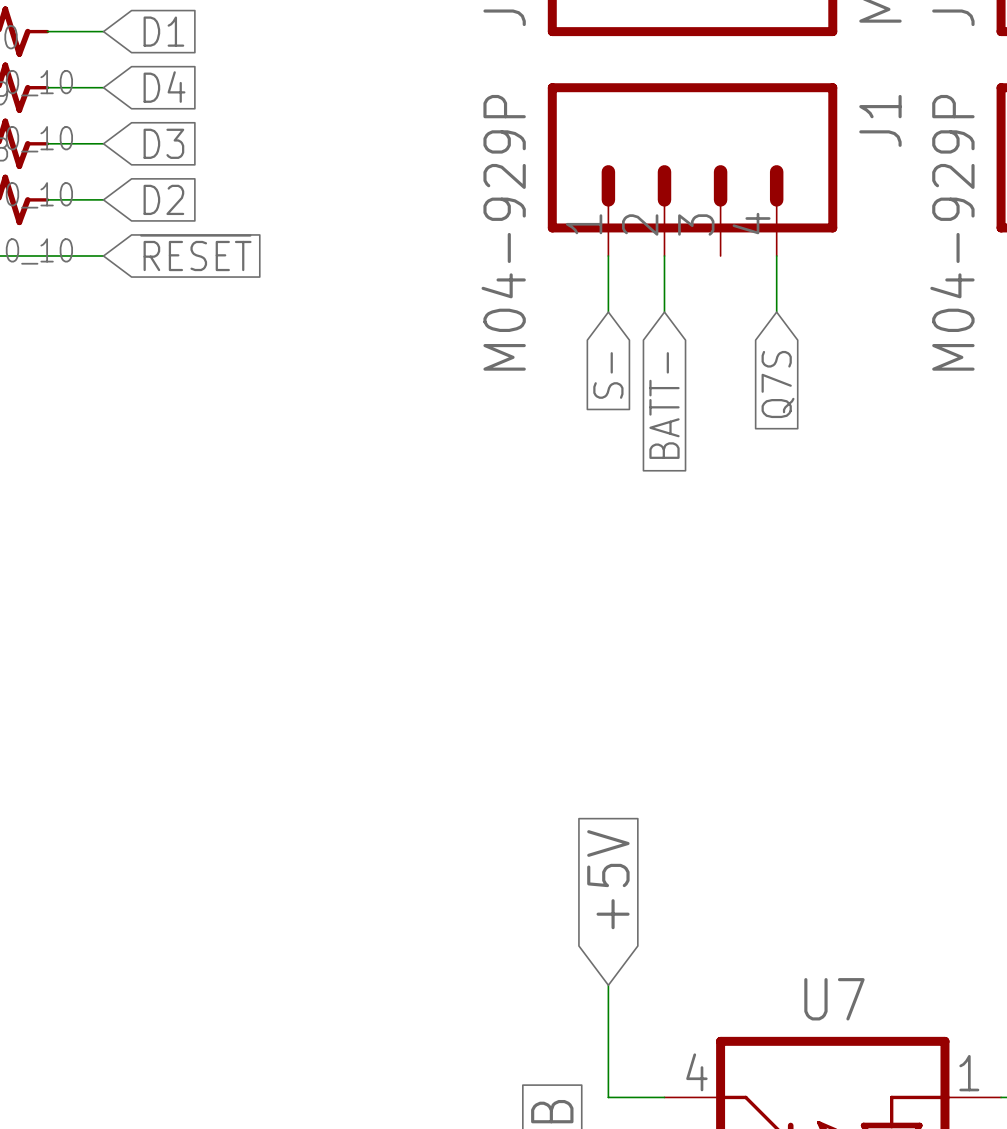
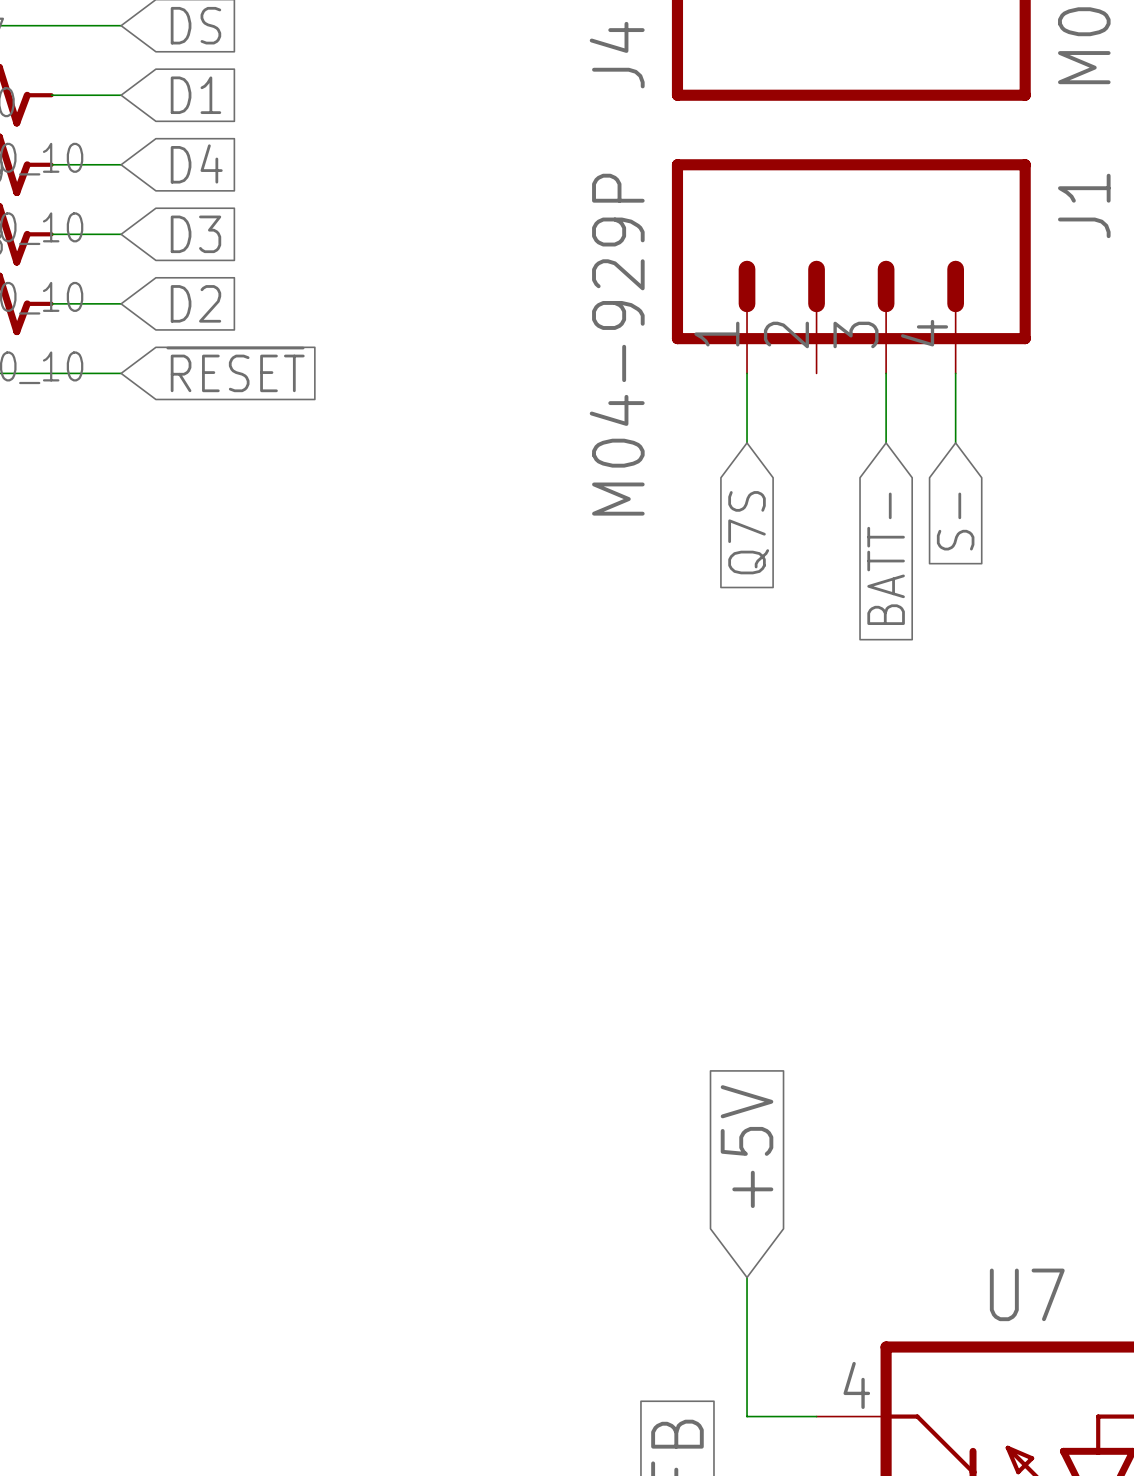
wire: (664, 255) (664, 312) -> (886, 373) (886, 442)
global label: S- (608, 375) -> Q7S (748, 532)
global label: Q7S (778, 384) -> S- (955, 521)
global label position: BATT- (664, 405) -> BATT- (886, 558)

